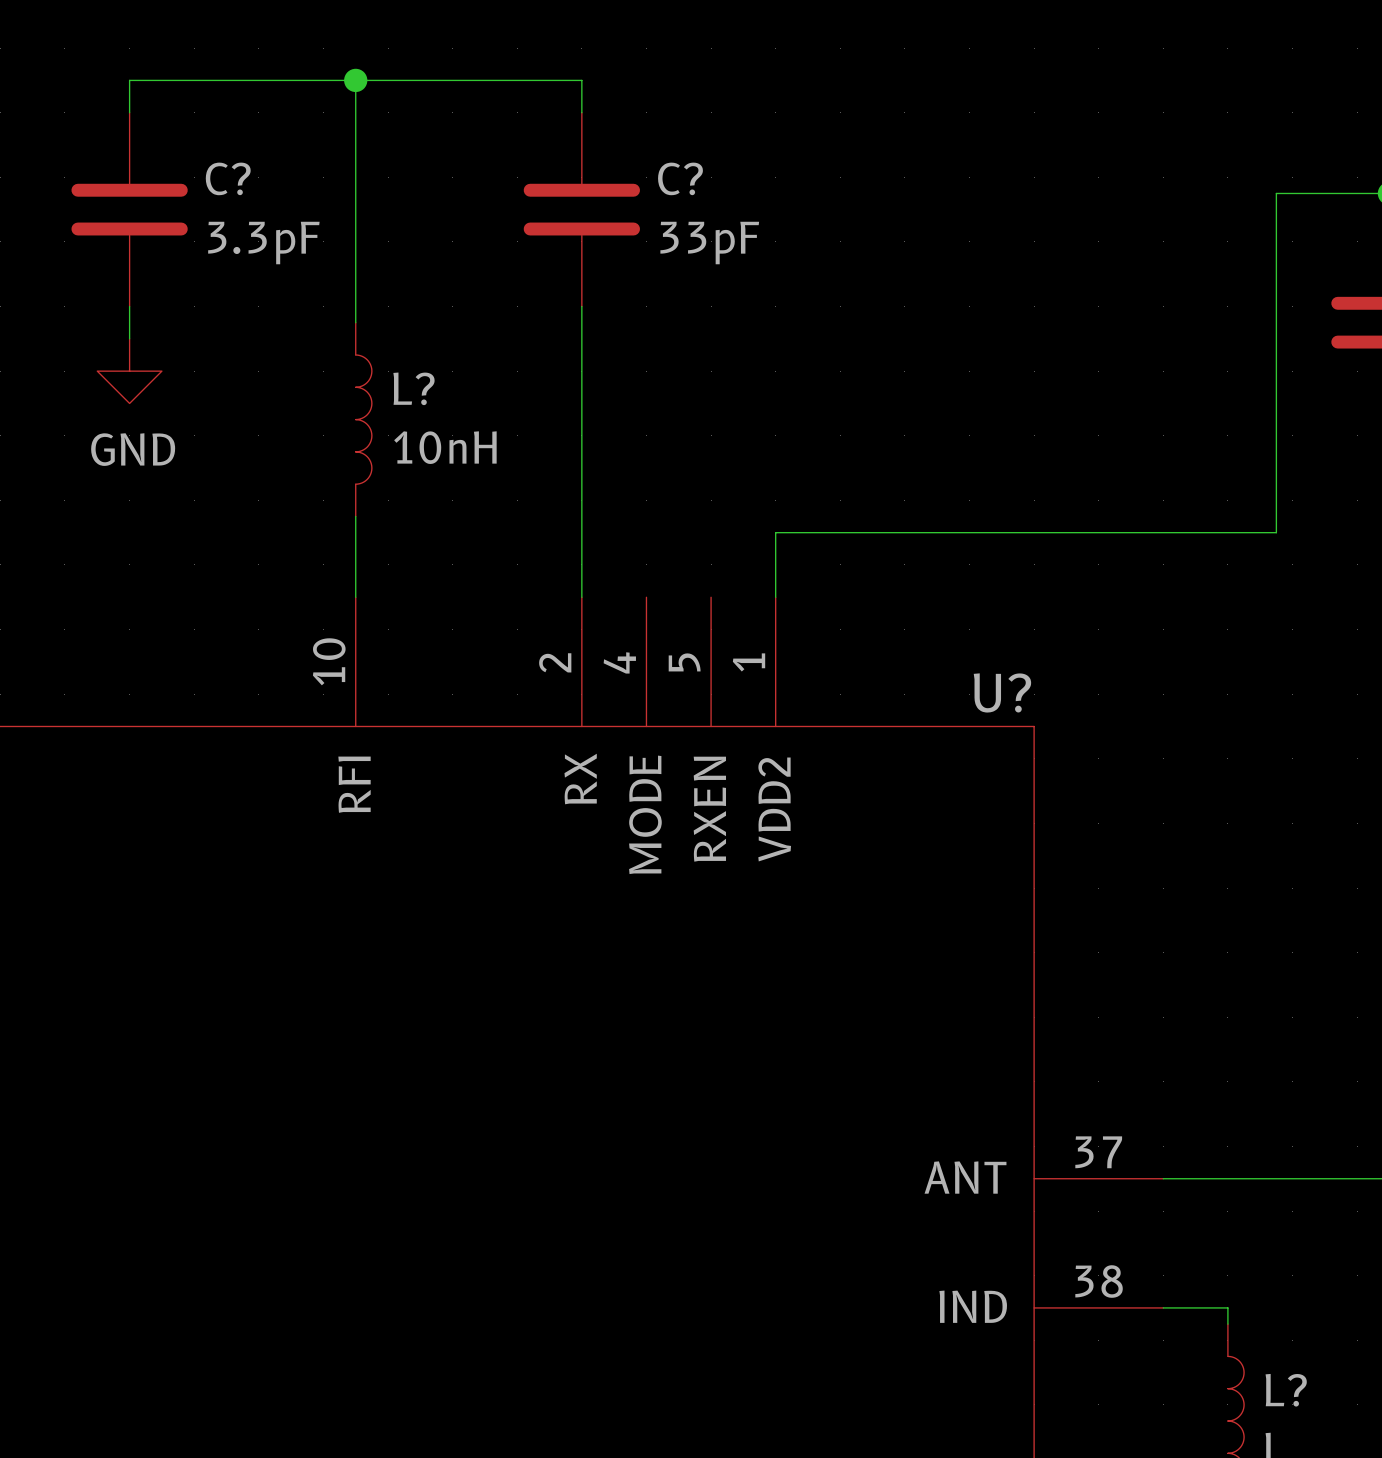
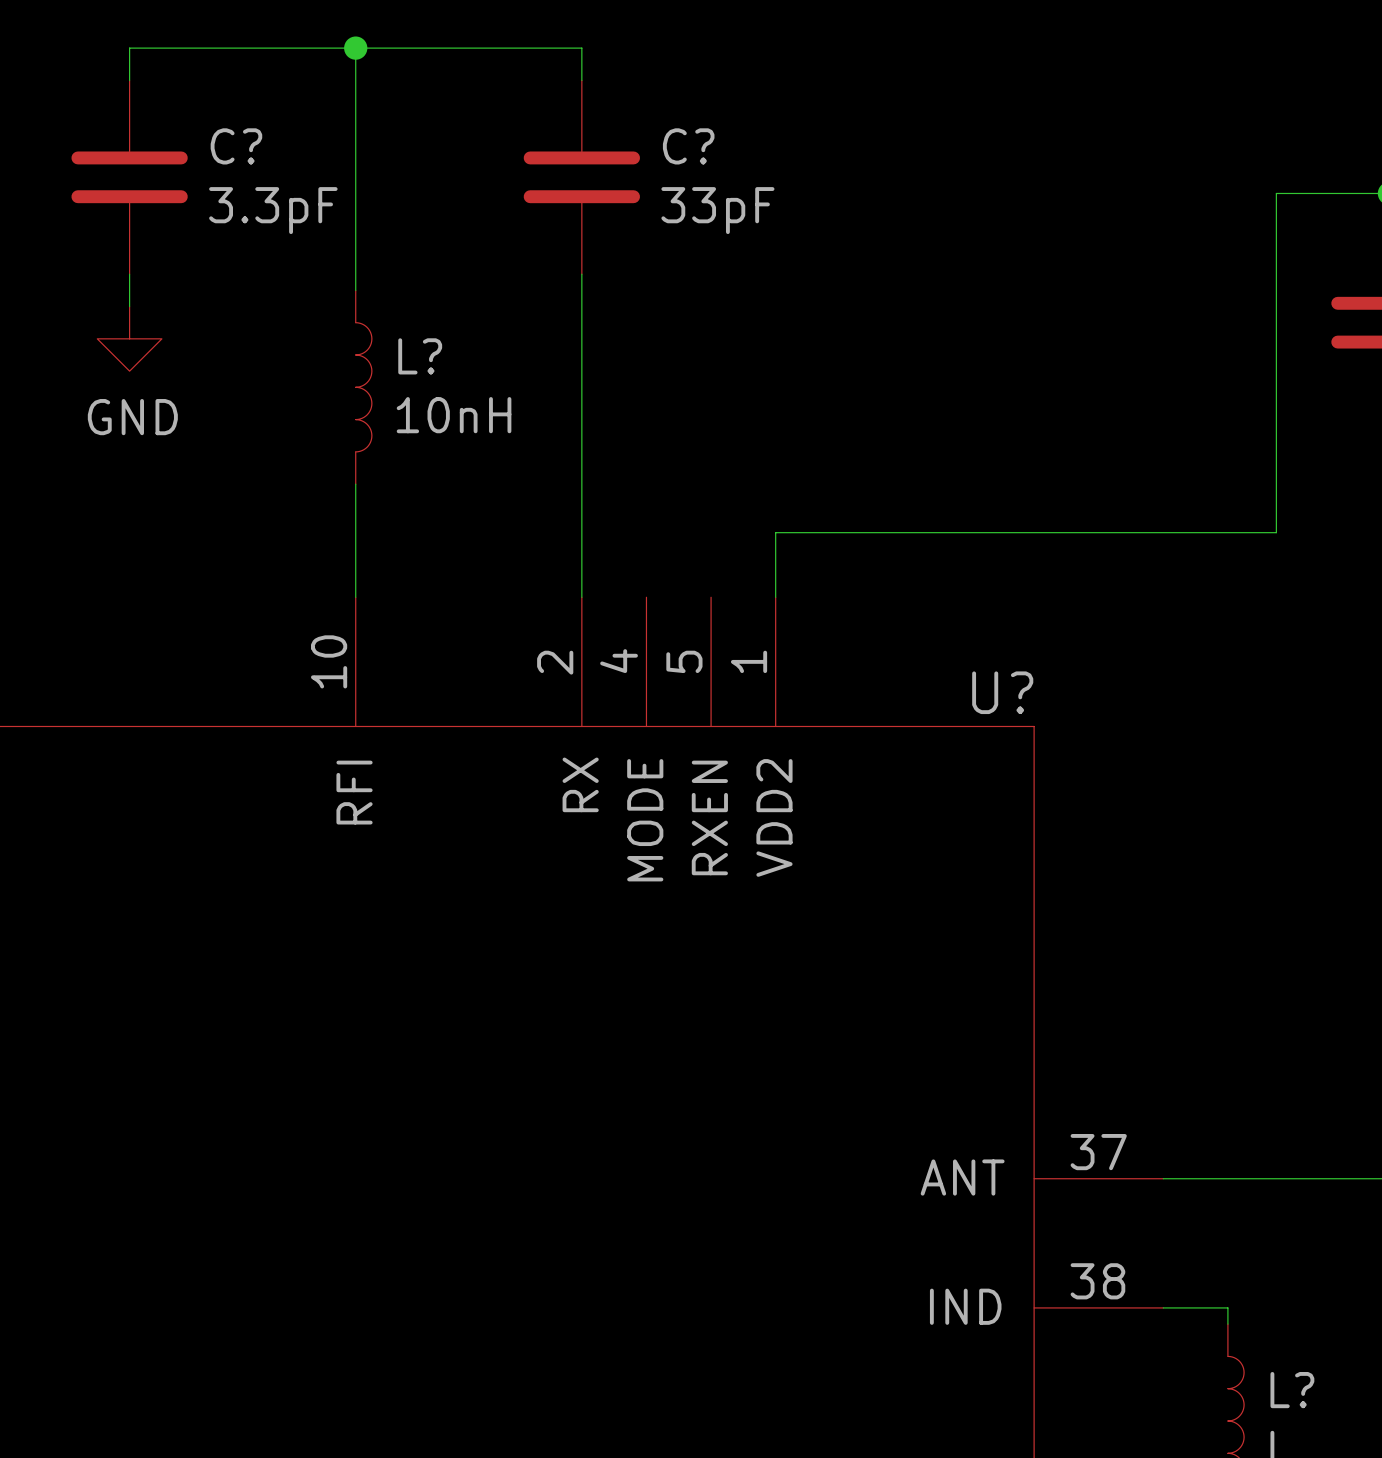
wire: none -> (355, 48) (355, 80)
junction position: (355, 80) -> (355, 48)
wire: (129, 112) (129, 80) (581, 80) (581, 112) -> (129, 80) (129, 48) (581, 48) (581, 80)
C? position: (129, 209) -> (129, 177)
C? position: (581, 209) -> (581, 177)
power symbol position: GND (129, 371) -> GND (129, 338)
L? position: (363, 419) -> (363, 387)

